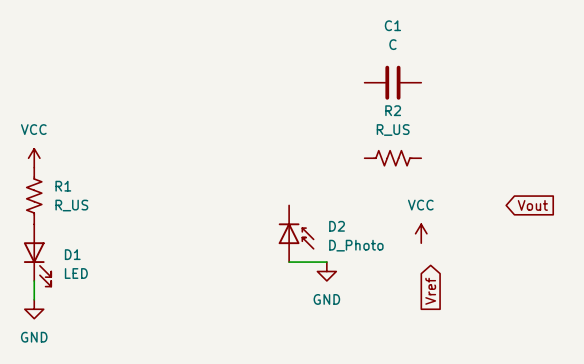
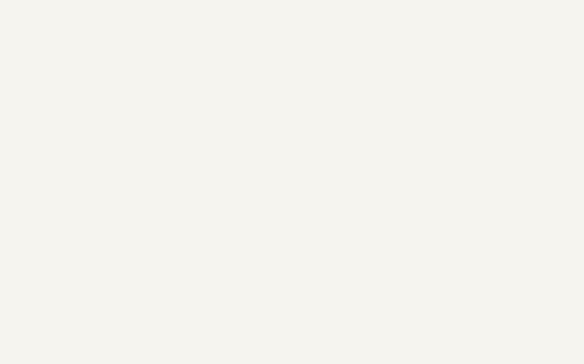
C1: C (392, 82) -> none
power symbol: VCC (34, 158) -> none
R2: R_US (392, 158) -> none
R1: R_US (34, 195) -> none
global label: Vout (532, 205) -> none
D2: D_Photo (296, 233) -> none
power symbol: VCC (421, 233) -> none
D1: LED (37, 255) -> none
wire: (289, 262) (326, 262) -> none
power symbol: GND (326, 271) -> none
wire: (34, 280) (34, 299) -> none
global label: Vref (430, 291) -> none
power symbol: GND (34, 309) -> none

